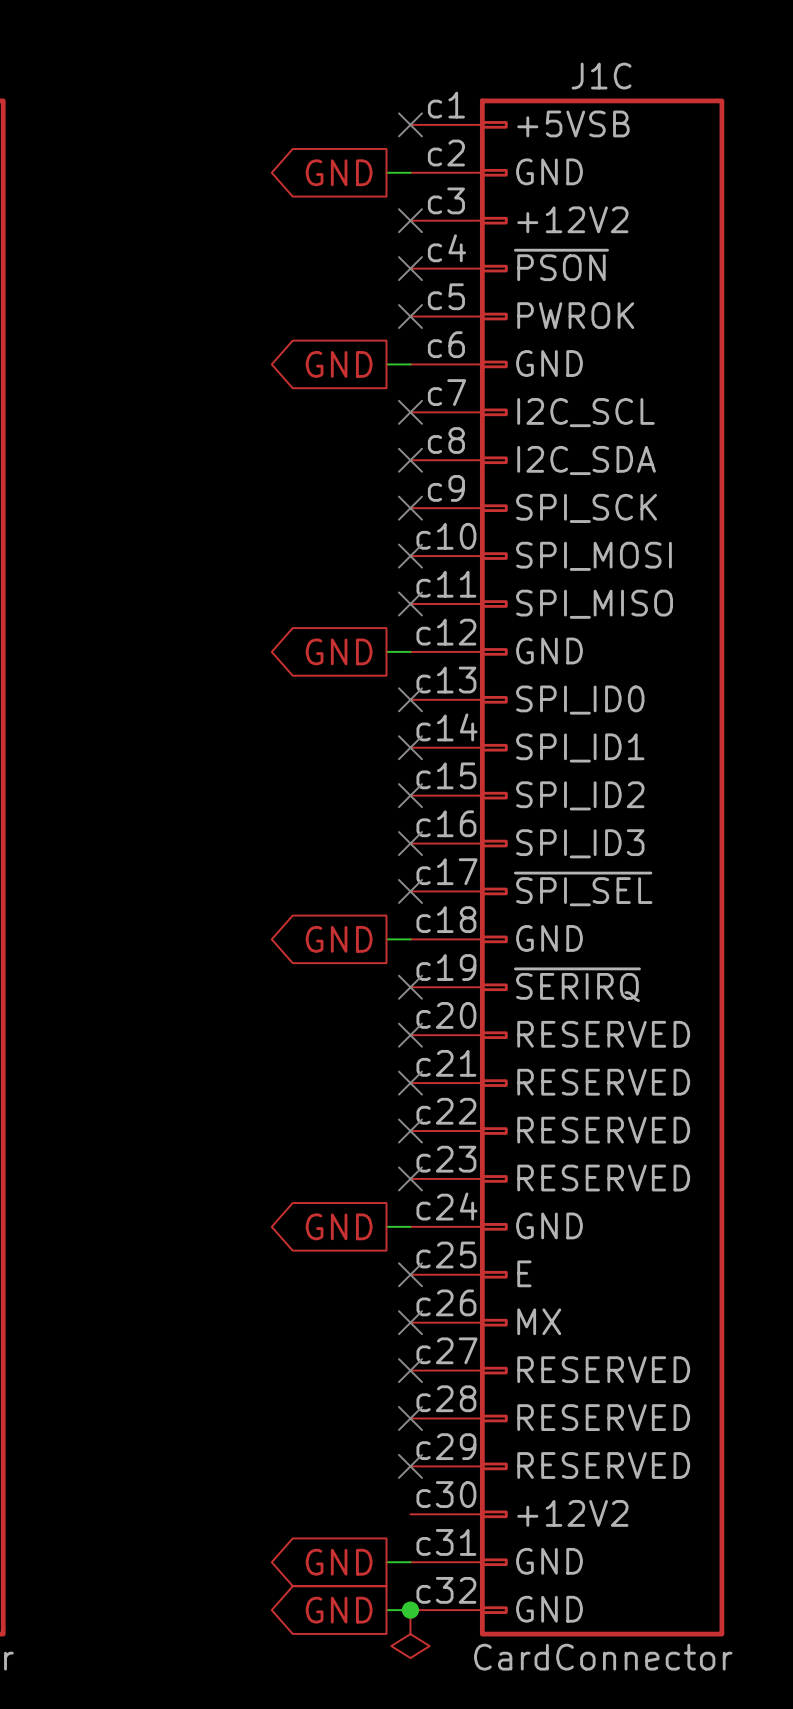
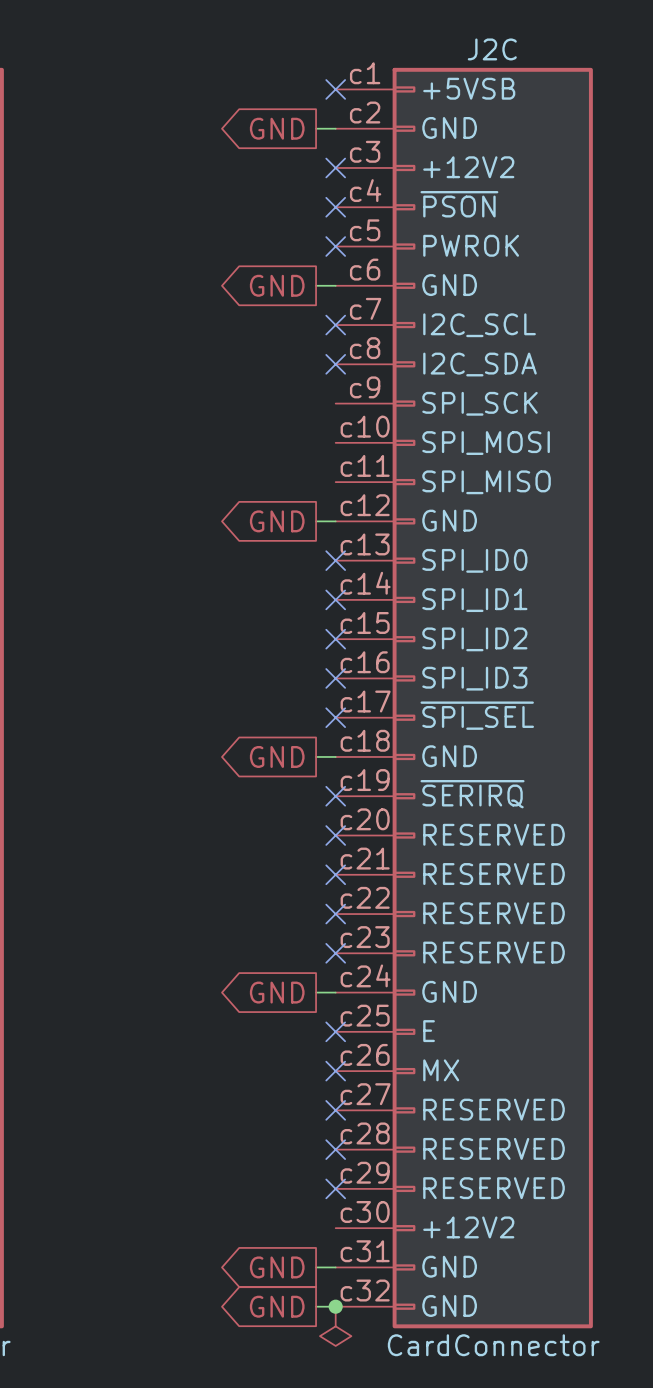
J1C name: J1C (601, 76) -> J2C (492, 49)
no-connect mark: (410, 508) -> none
no-connect mark: (410, 556) -> none
no-connect mark: (410, 603) -> none

